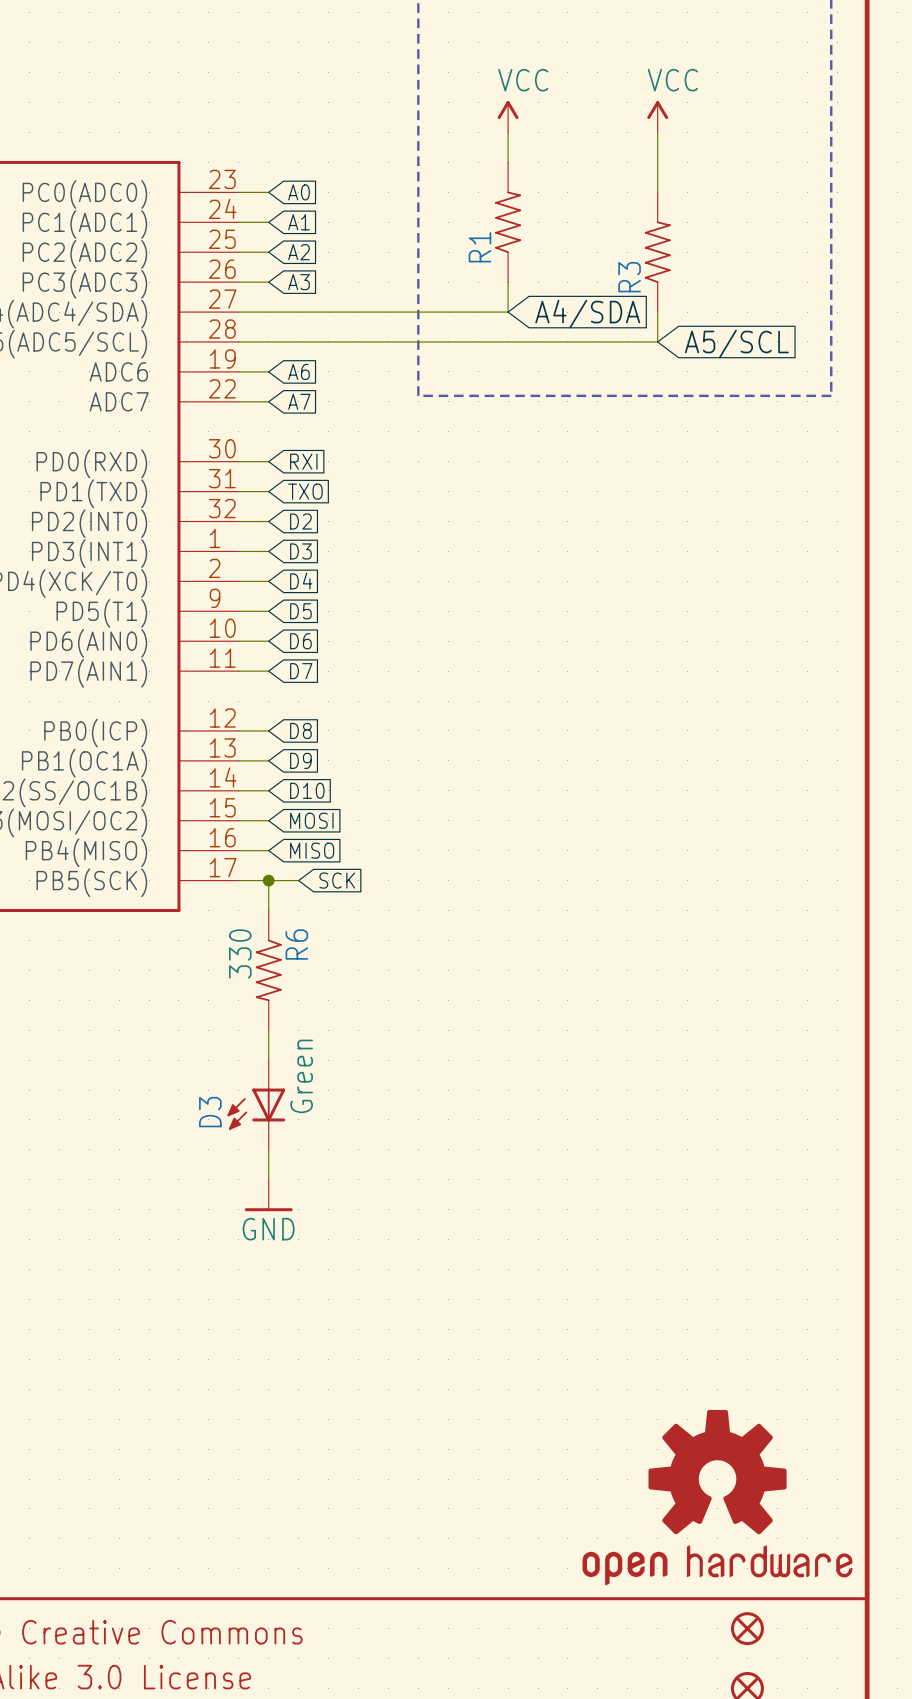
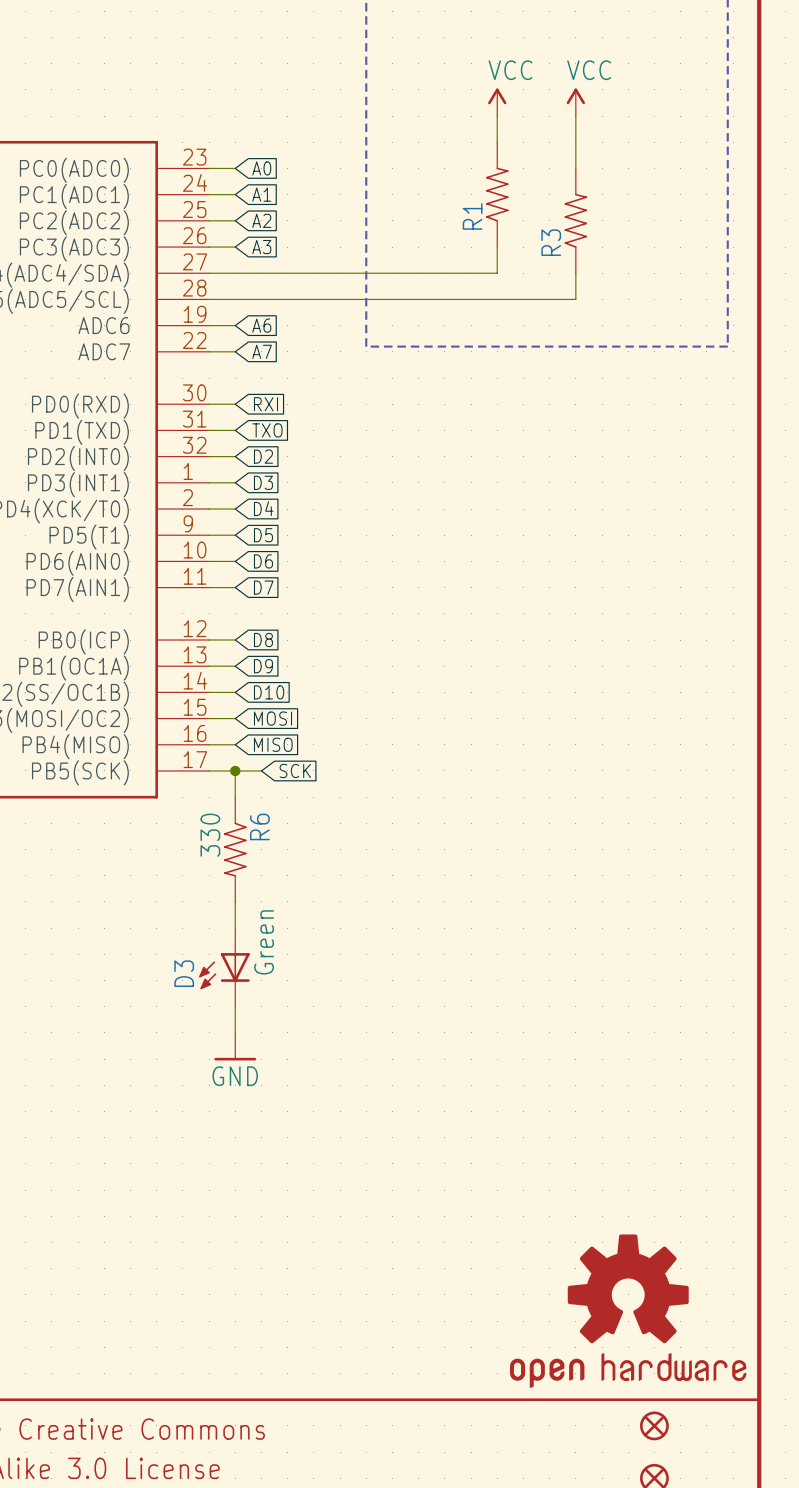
power symbol position: VCC (508, 116) -> VCC (497, 102)
wire: (508, 132) (508, 162) -> (497, 116) (497, 142)
R1 position: (508, 222) -> (497, 194)
wire: (508, 282) (508, 312) -> (497, 247) (497, 273) (444, 273)
global label: A4/SDA (587, 314) -> none
global label: A5/SCL (736, 343) -> none

